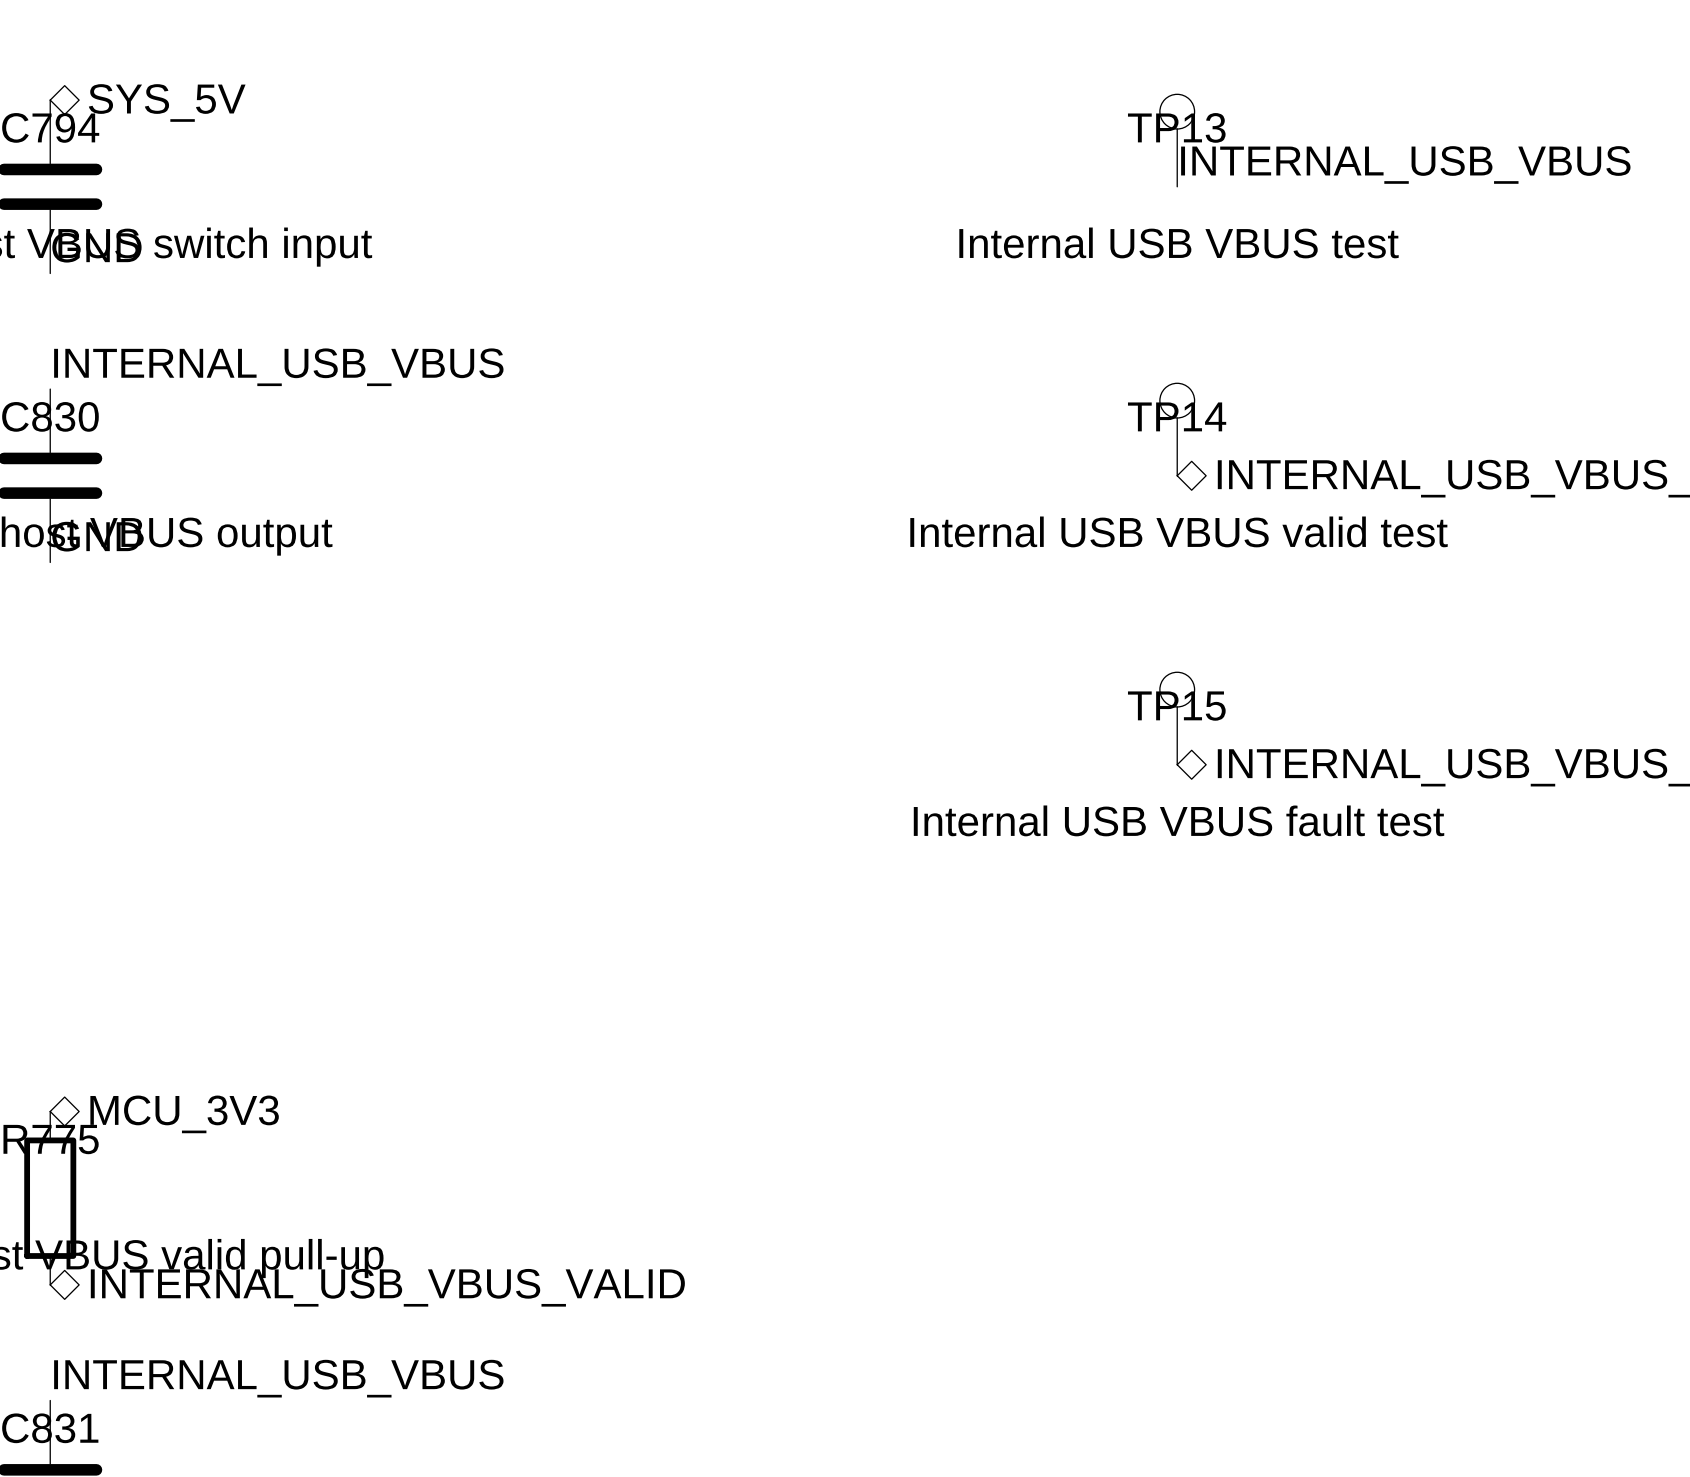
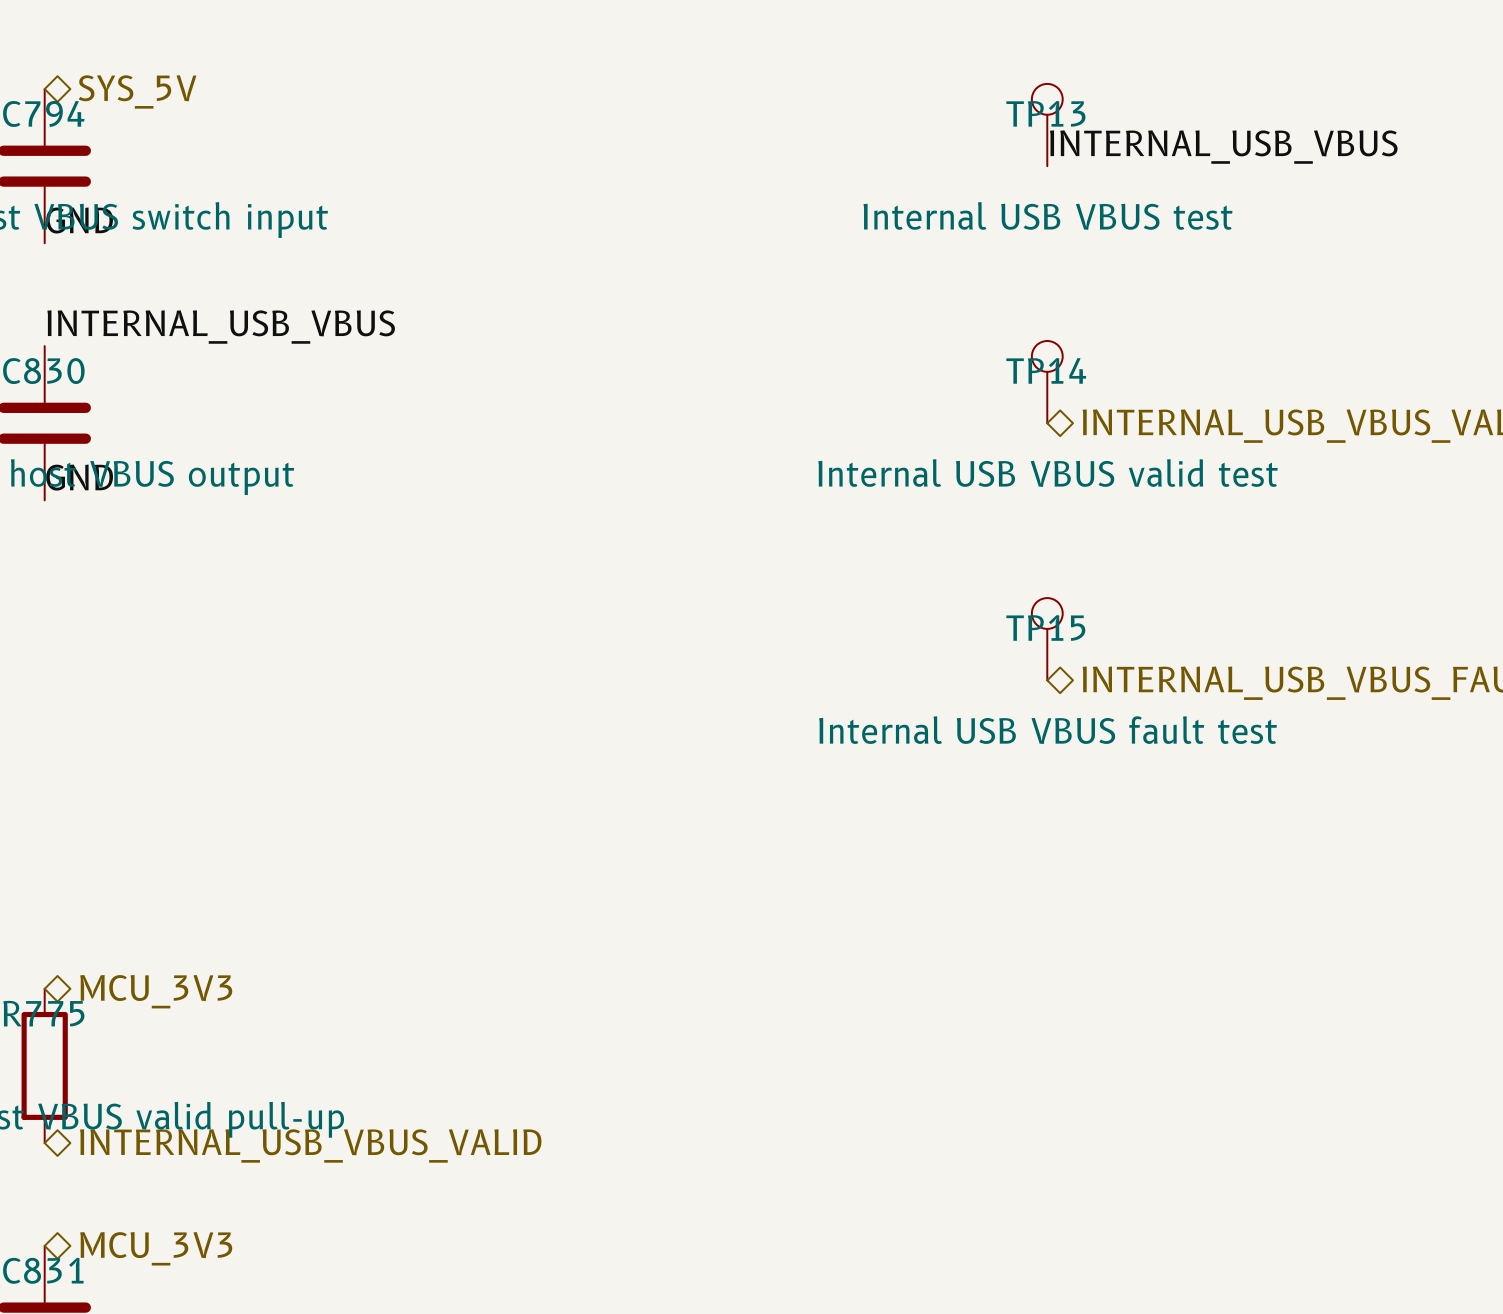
label: INTERNAL_USB_VBUS (278, 1378) -> none
hierarchical label: none -> MCU_3V3 (156, 1248)

